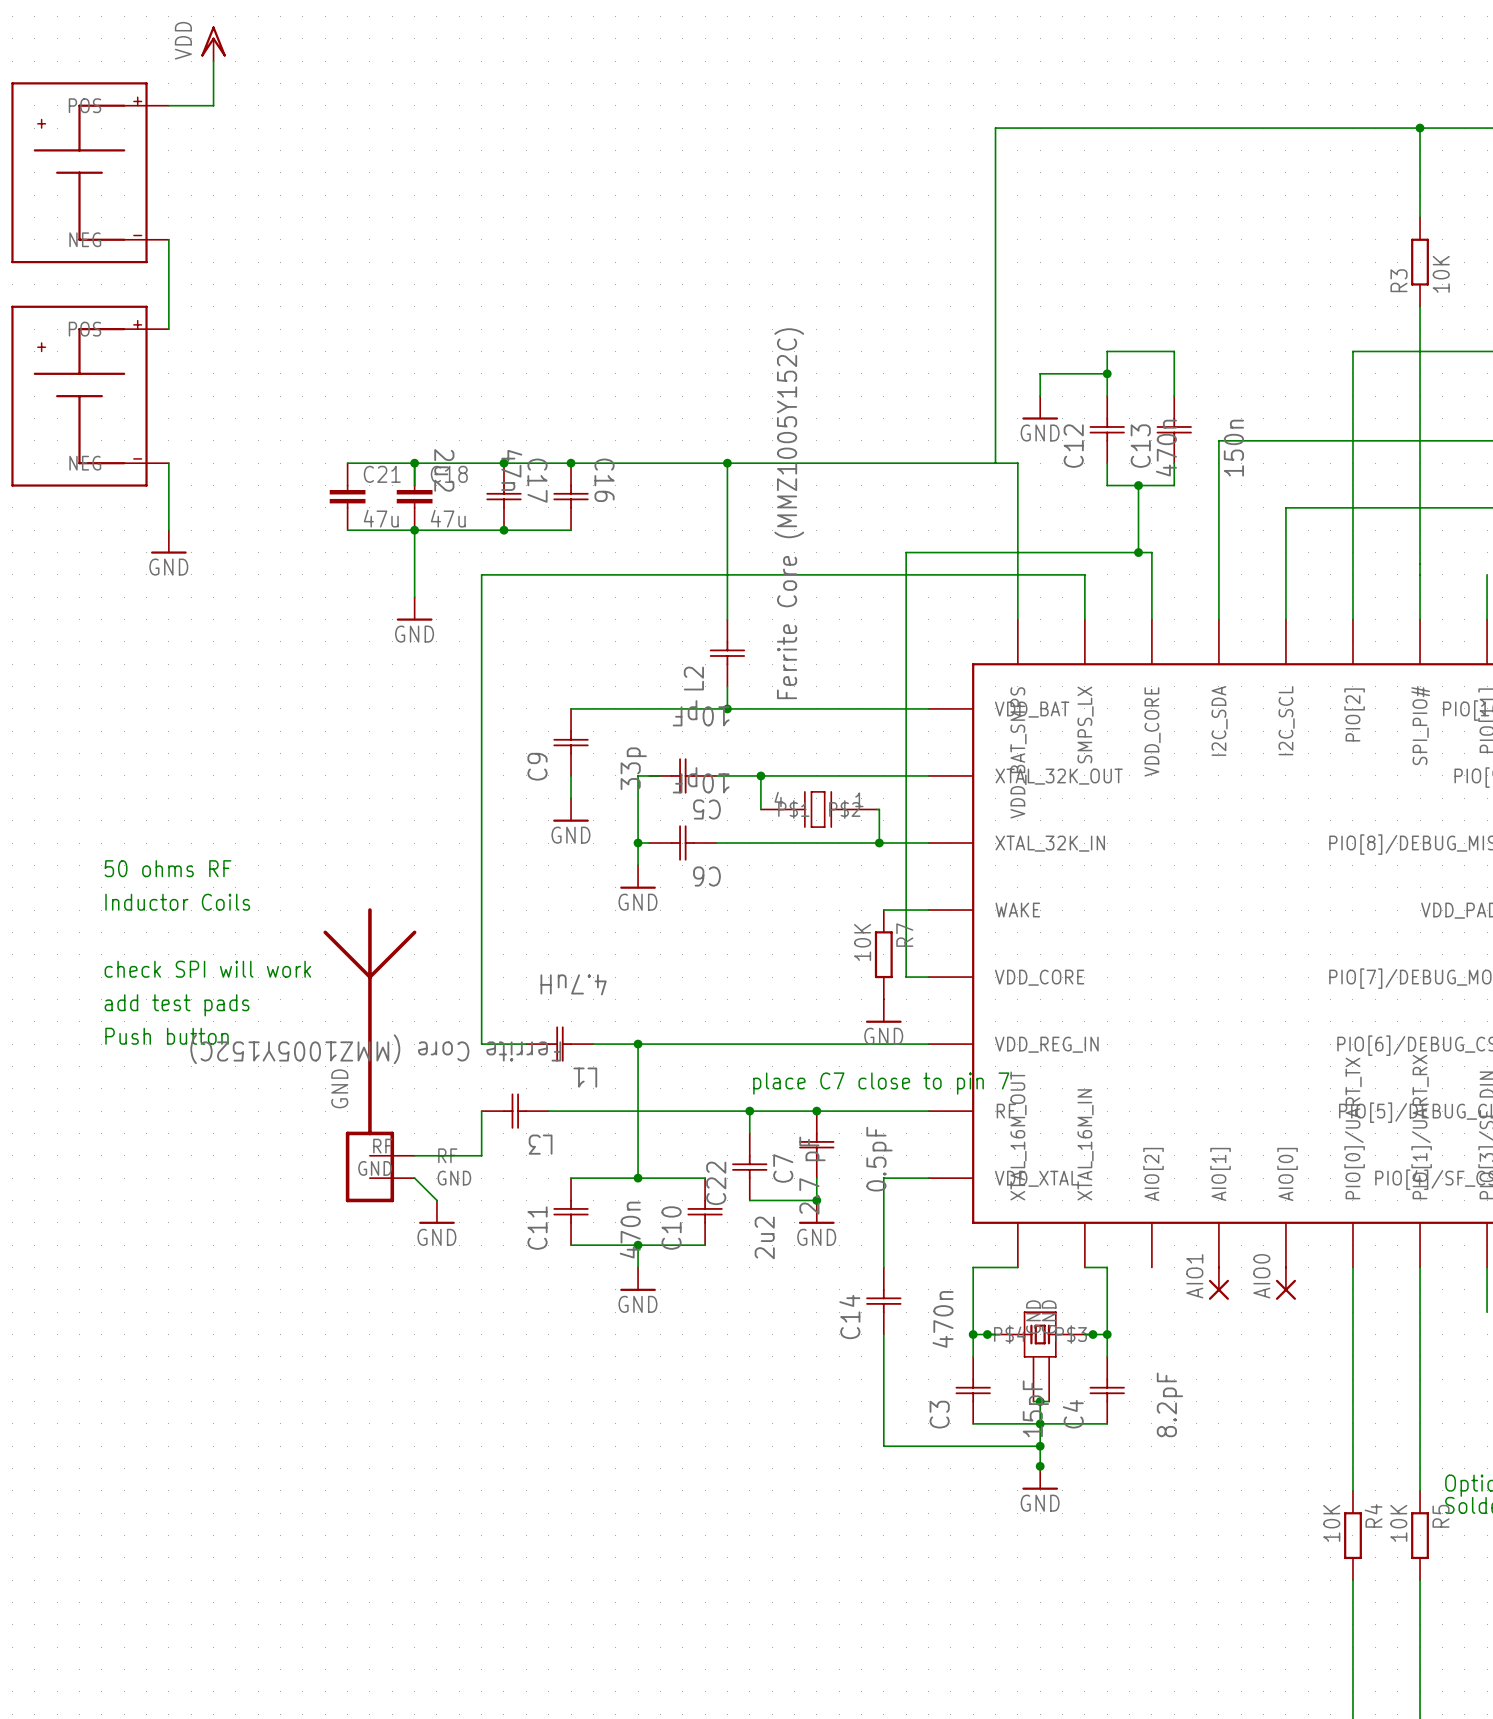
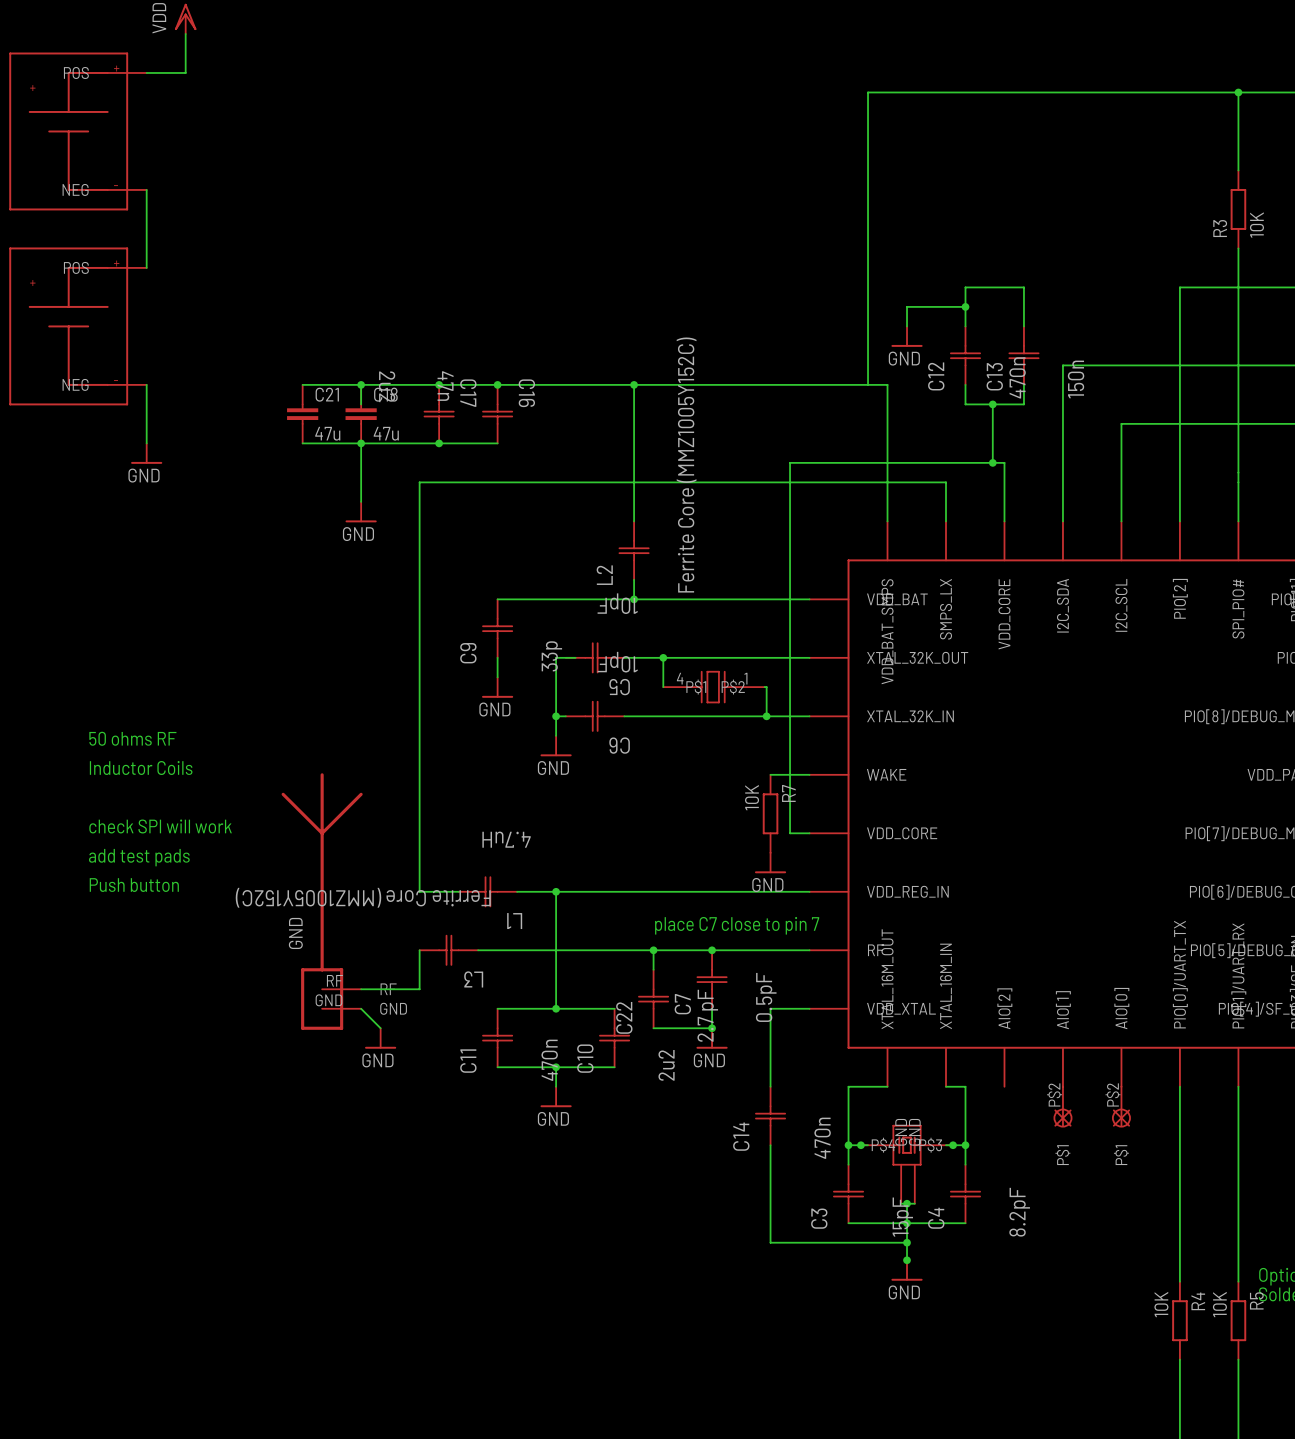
AIO1: (1218, 1283) -> none
AIO0: (1285, 1283) -> none
part: none -> (1062, 1106)
part: none -> (1121, 1106)

